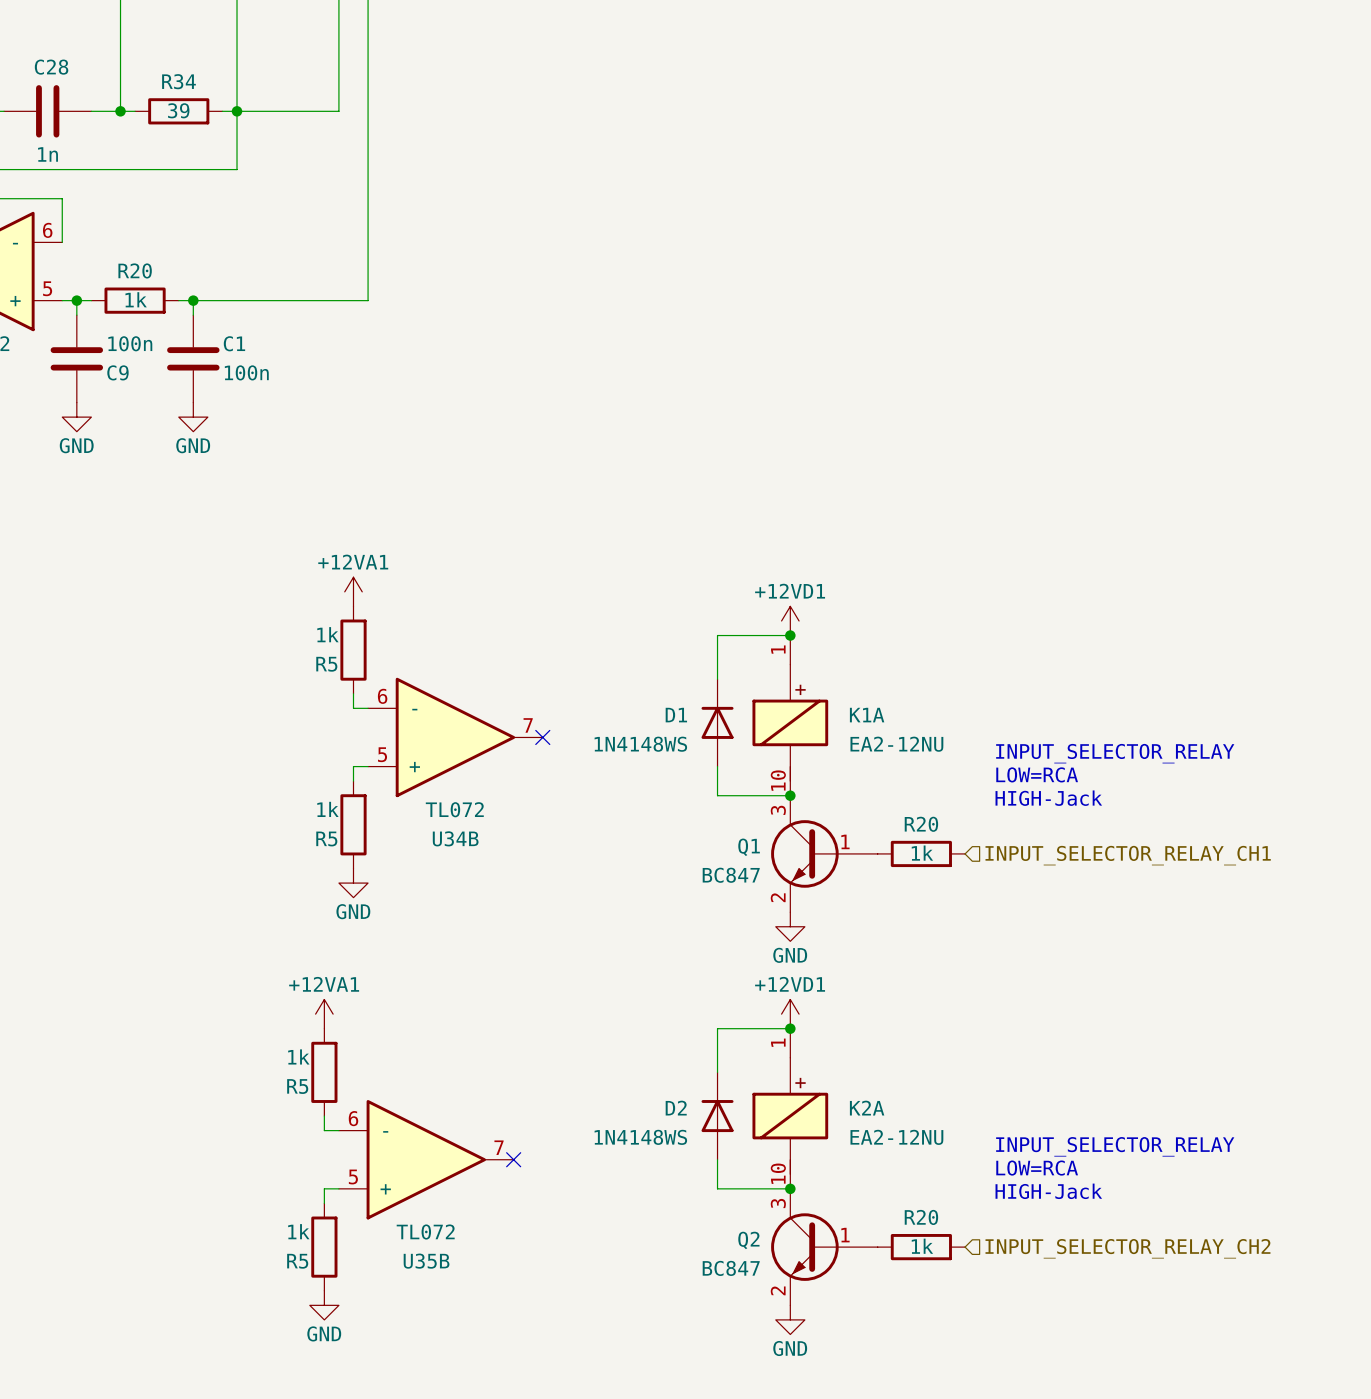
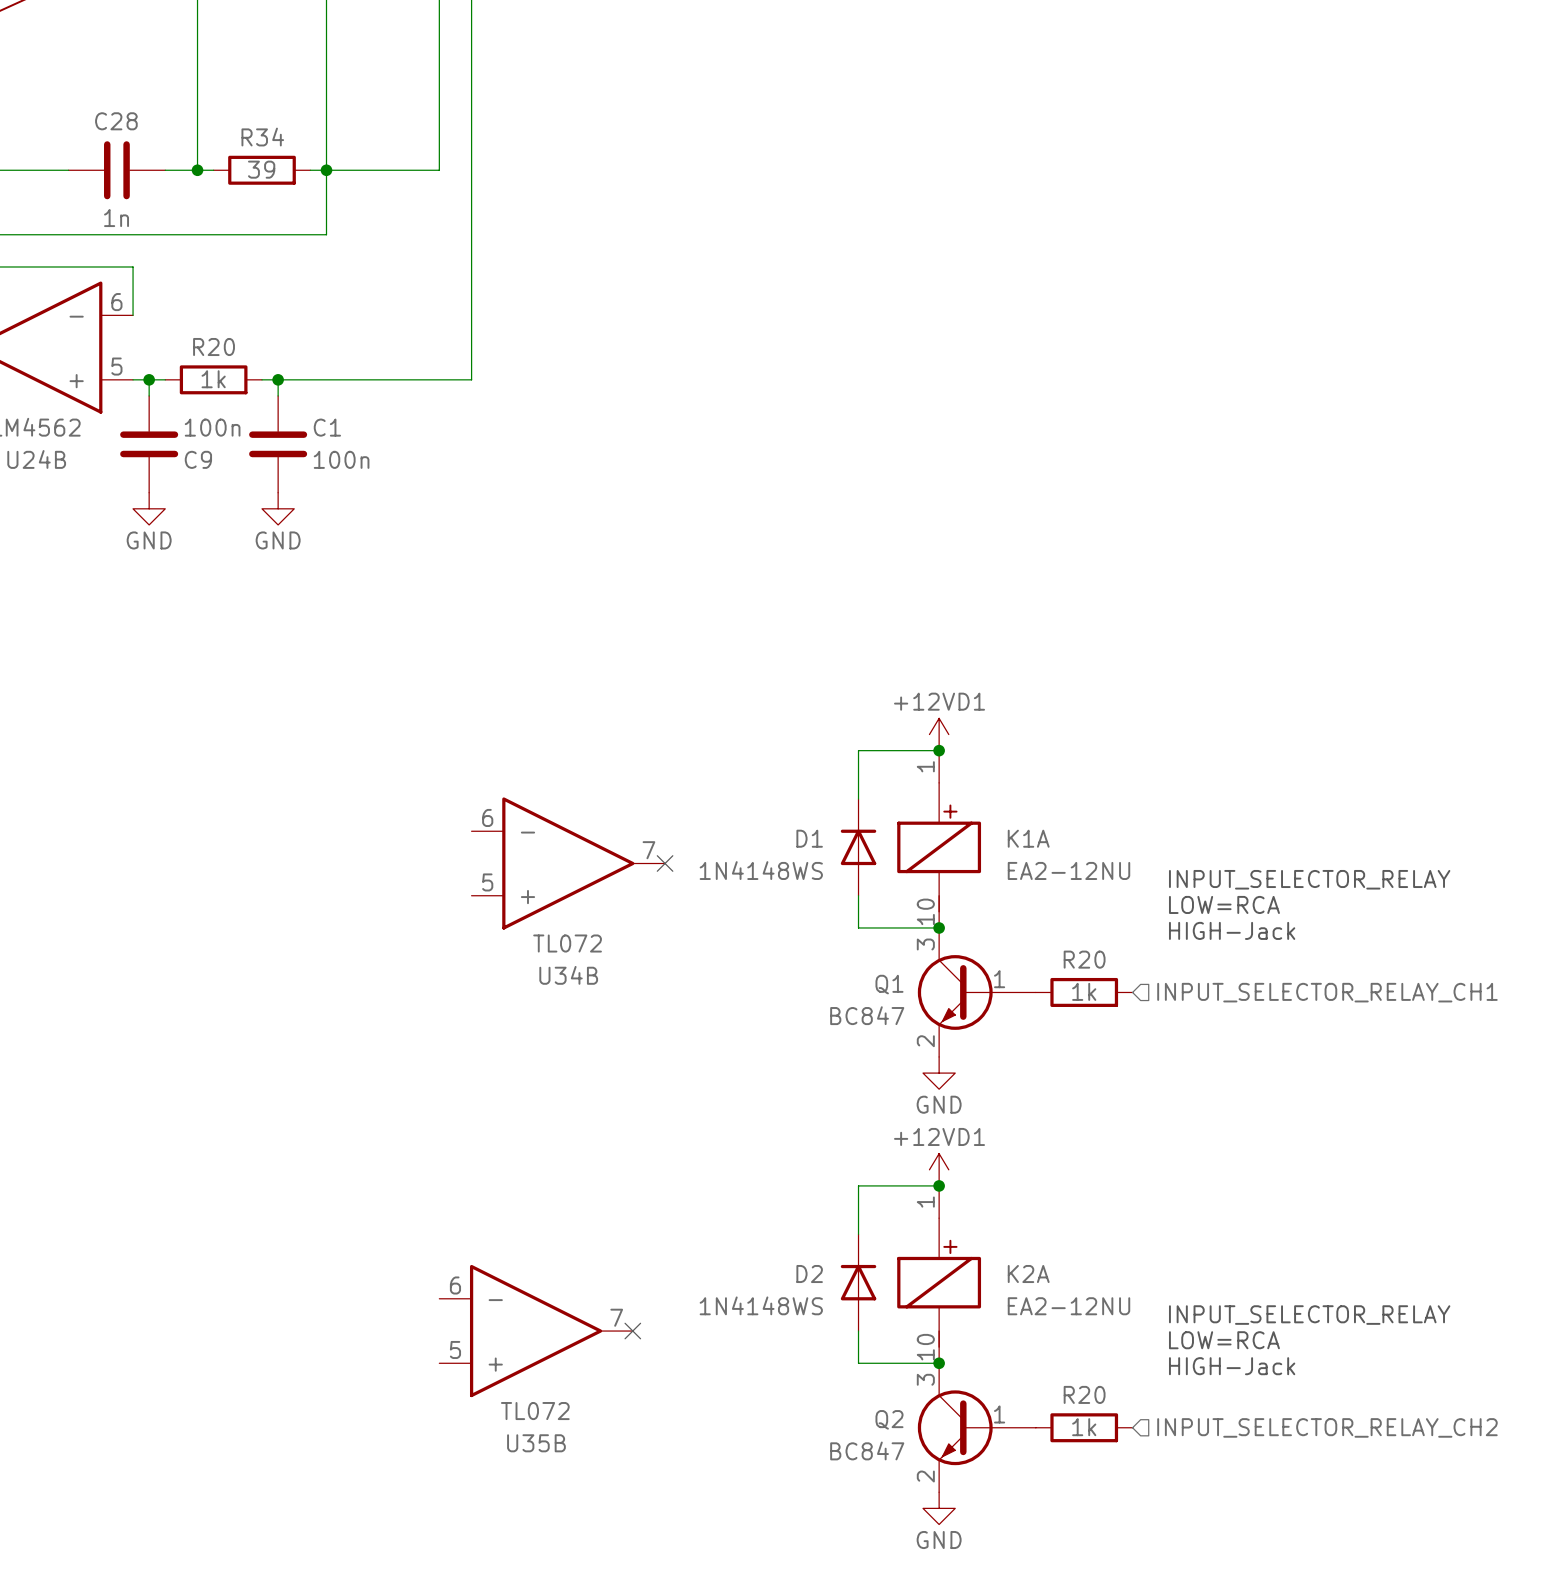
power symbol: +12VA1 (353, 591) -> none
R5: 1k (353, 650) -> none
wire: (353, 693) (353, 708) (368, 708) -> none
wire: (368, 766) (353, 766) (353, 781) -> none
R5: 1k (353, 824) -> none
power symbol: GND (353, 883) -> none
power symbol: +12VA1 (324, 1014) -> none
R5: 1k (324, 1072) -> none
wire: (324, 1116) (324, 1130) (338, 1130) -> none
wire: (338, 1188) (324, 1188) (324, 1203) -> none
R5: 1k (324, 1247) -> none
power symbol: GND (324, 1305) -> none

